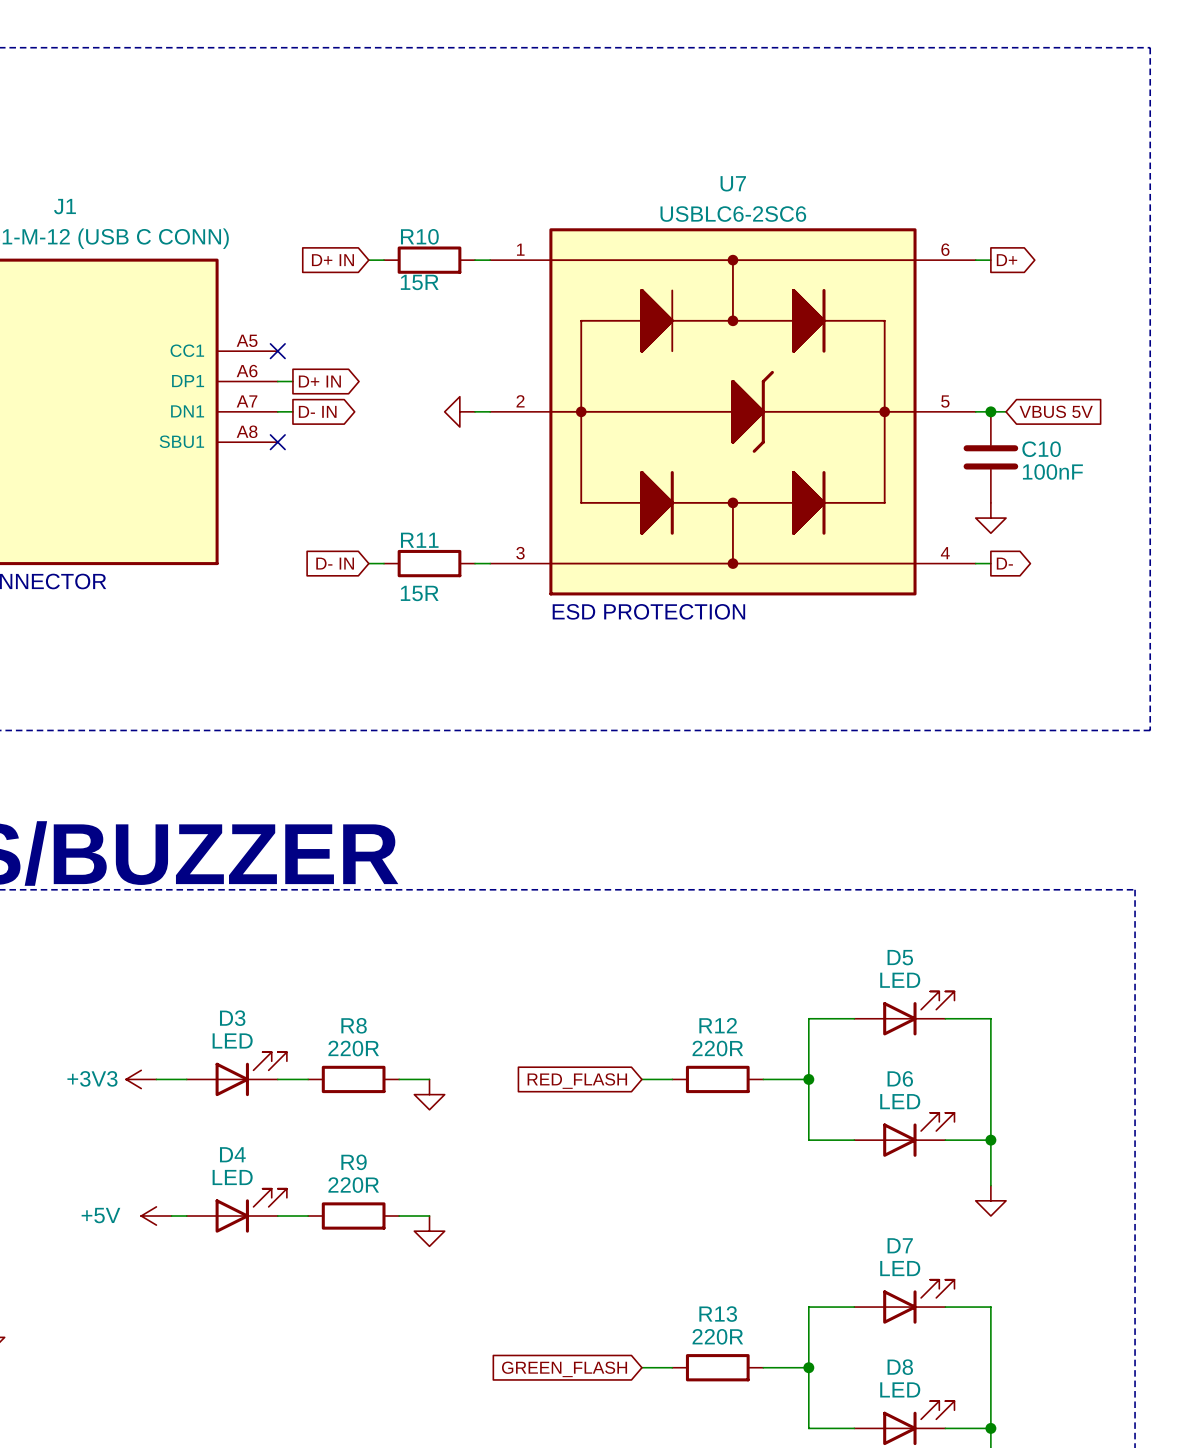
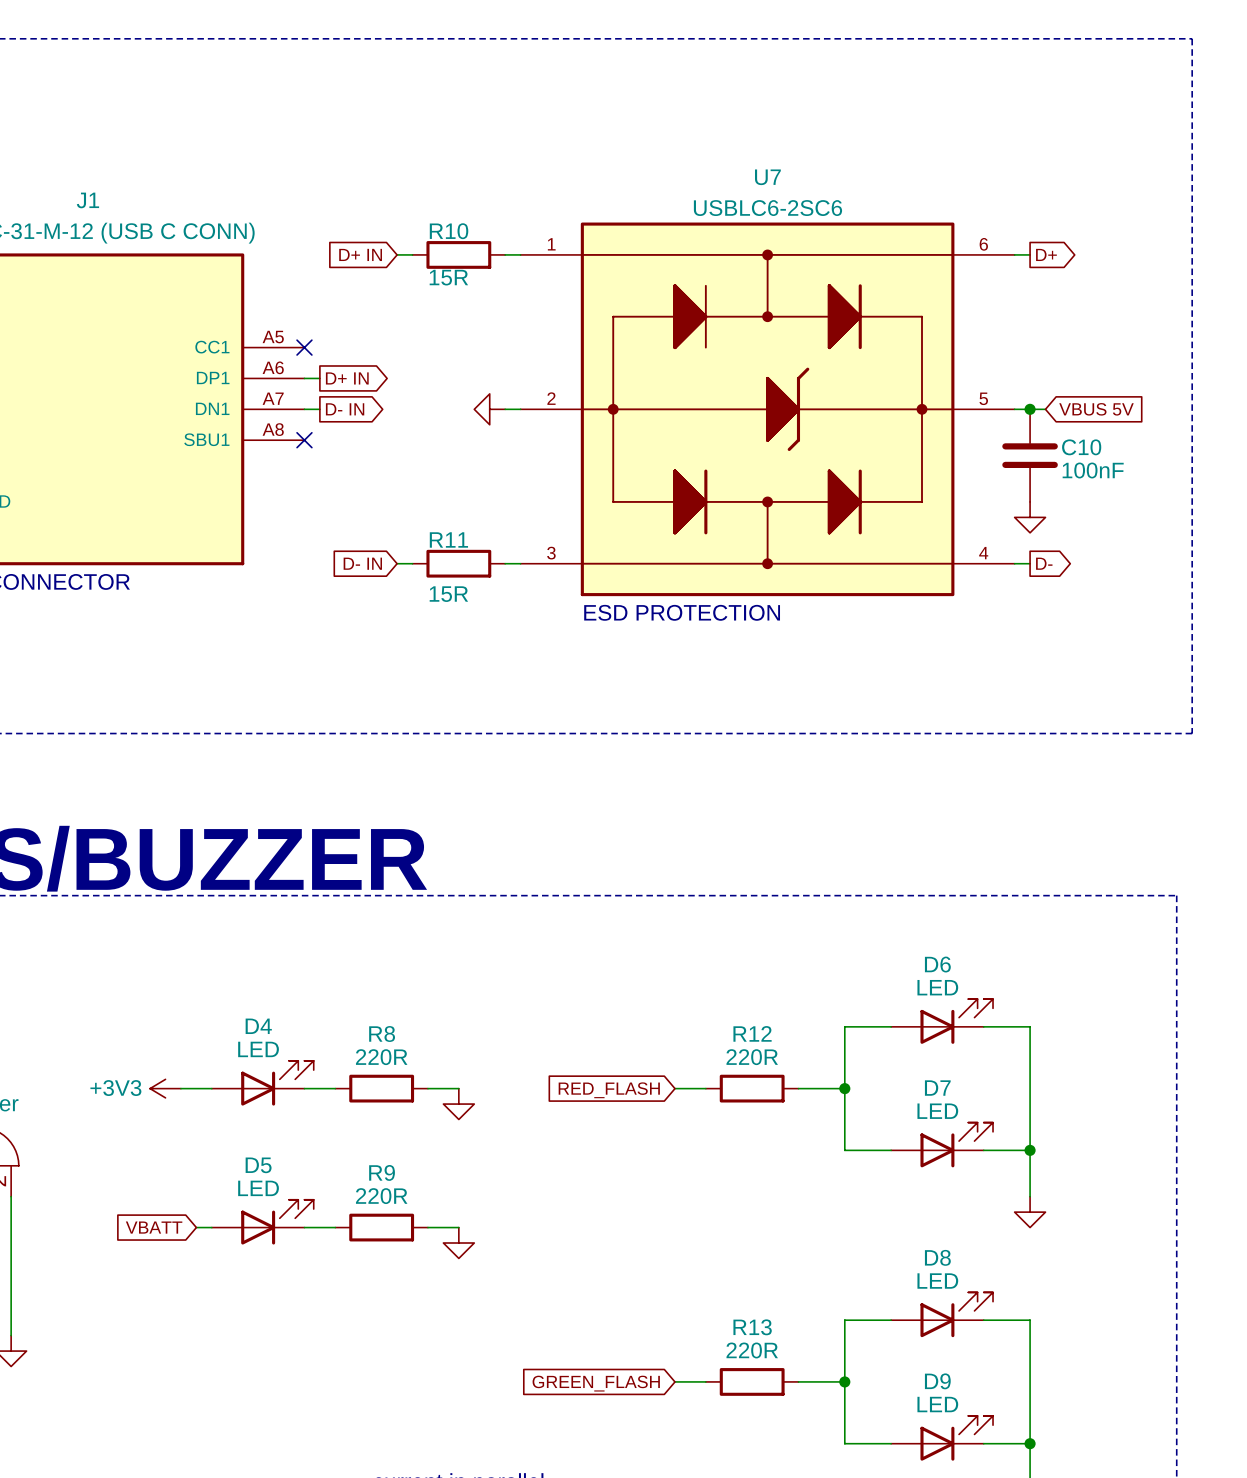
D5 name: D5 (900, 957) -> D6 (937, 964)
D3 name: D3 (232, 1018) -> D4 (258, 1026)
D6 name: D6 (900, 1078) -> D7 (937, 1088)
D4 name: D4 (232, 1154) -> D5 (258, 1165)
global label: none -> VBATT (154, 1227)
power symbol: +5V (156, 1216) -> none
D7 name: D7 (900, 1245) -> D8 (937, 1257)
D8 name: D8 (900, 1367) -> D9 (937, 1381)

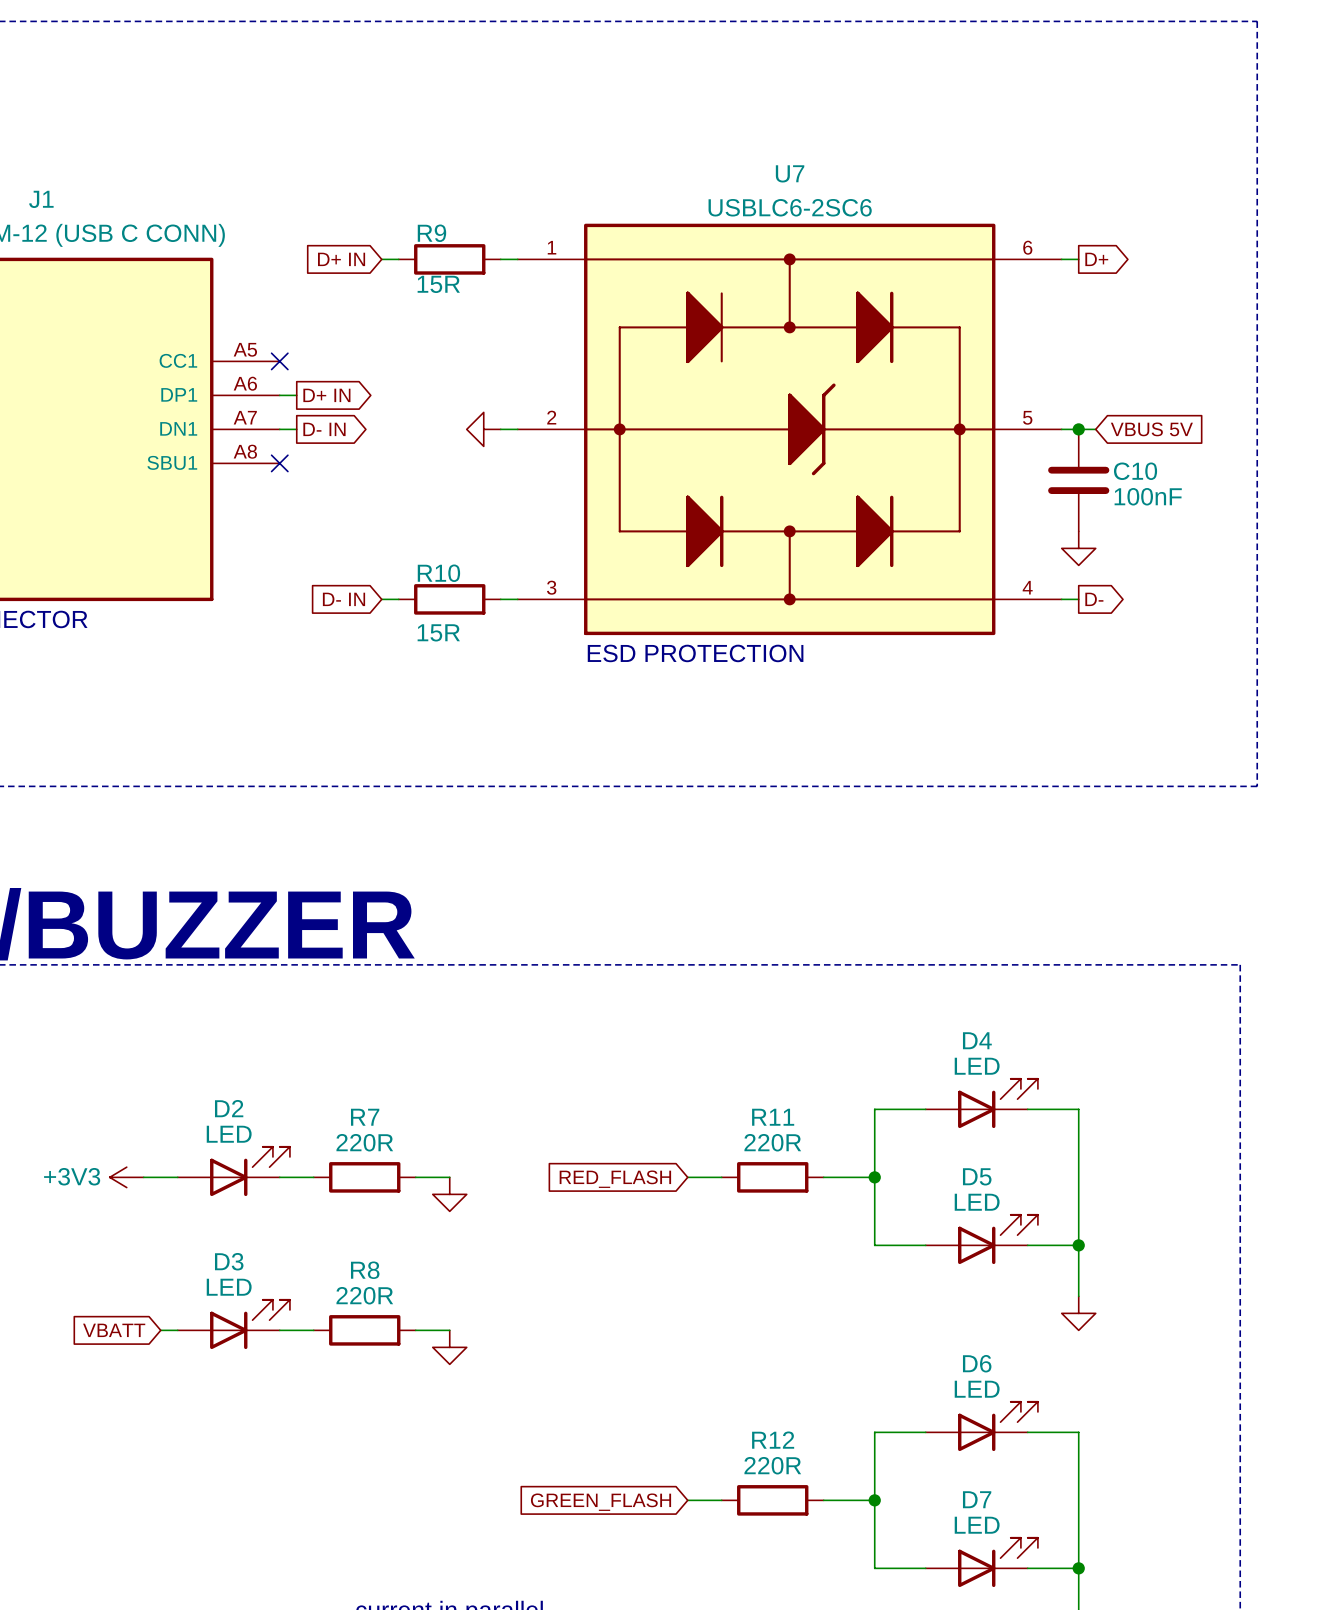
R10 name: R10 (449, 231) -> R9 (431, 233)
R11 name: R11 (448, 539) -> R10 (438, 573)
D6 name: D6 (937, 964) -> D4 (977, 1040)
D4 name: D4 (258, 1026) -> D2 (229, 1108)
R12 name: R12 (752, 1033) -> R11 (773, 1117)
R8 name: R8 (382, 1034) -> R7 (365, 1117)
D7 name: D7 (937, 1088) -> D5 (977, 1176)
D5 name: D5 (258, 1165) -> D3 (229, 1261)
R9 name: R9 (382, 1172) -> R8 (365, 1270)
D8 name: D8 (937, 1257) -> D6 (977, 1363)
R13 name: R13 (752, 1327) -> R12 (773, 1440)
D9 name: D9 (937, 1381) -> D7 (977, 1499)

